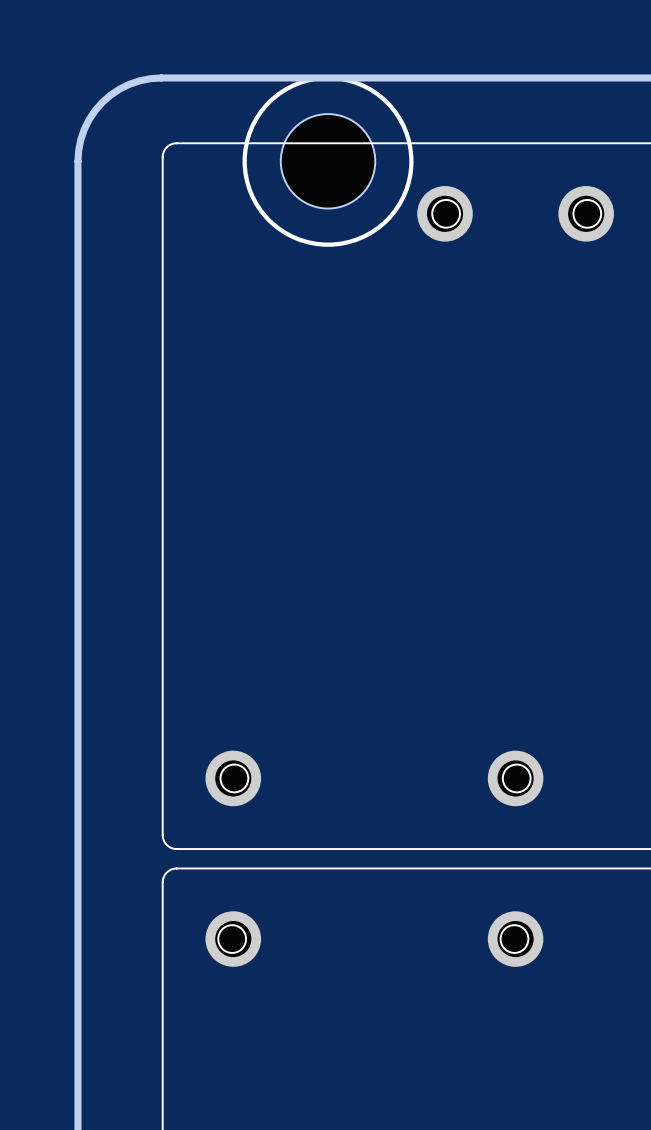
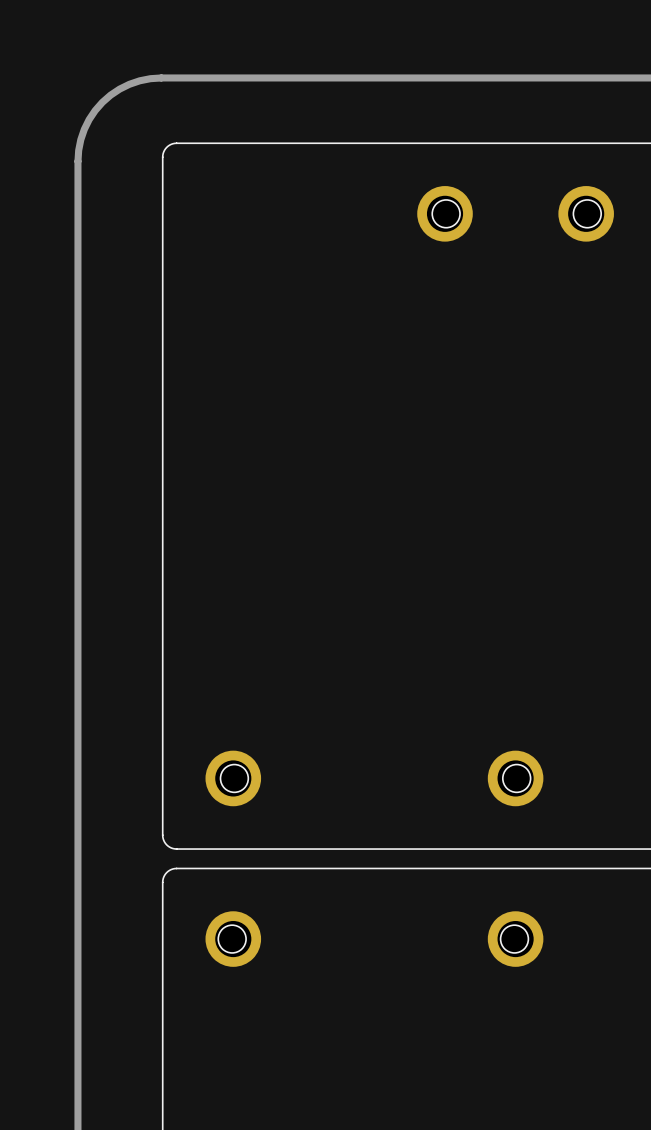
drawing: [242, 75, 414, 247] -> none
hole: (328, 161) -> none

